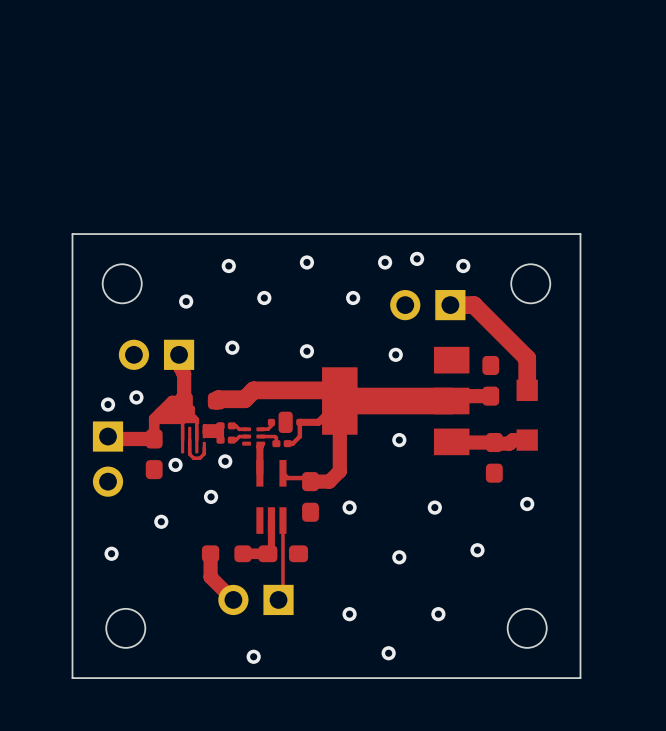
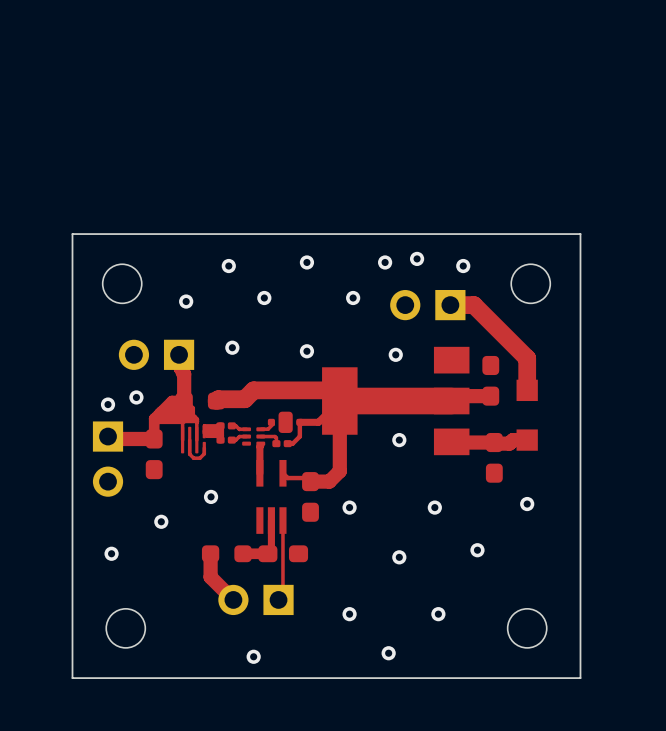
via: (225, 461) -> none
via: (175, 464) -> none

